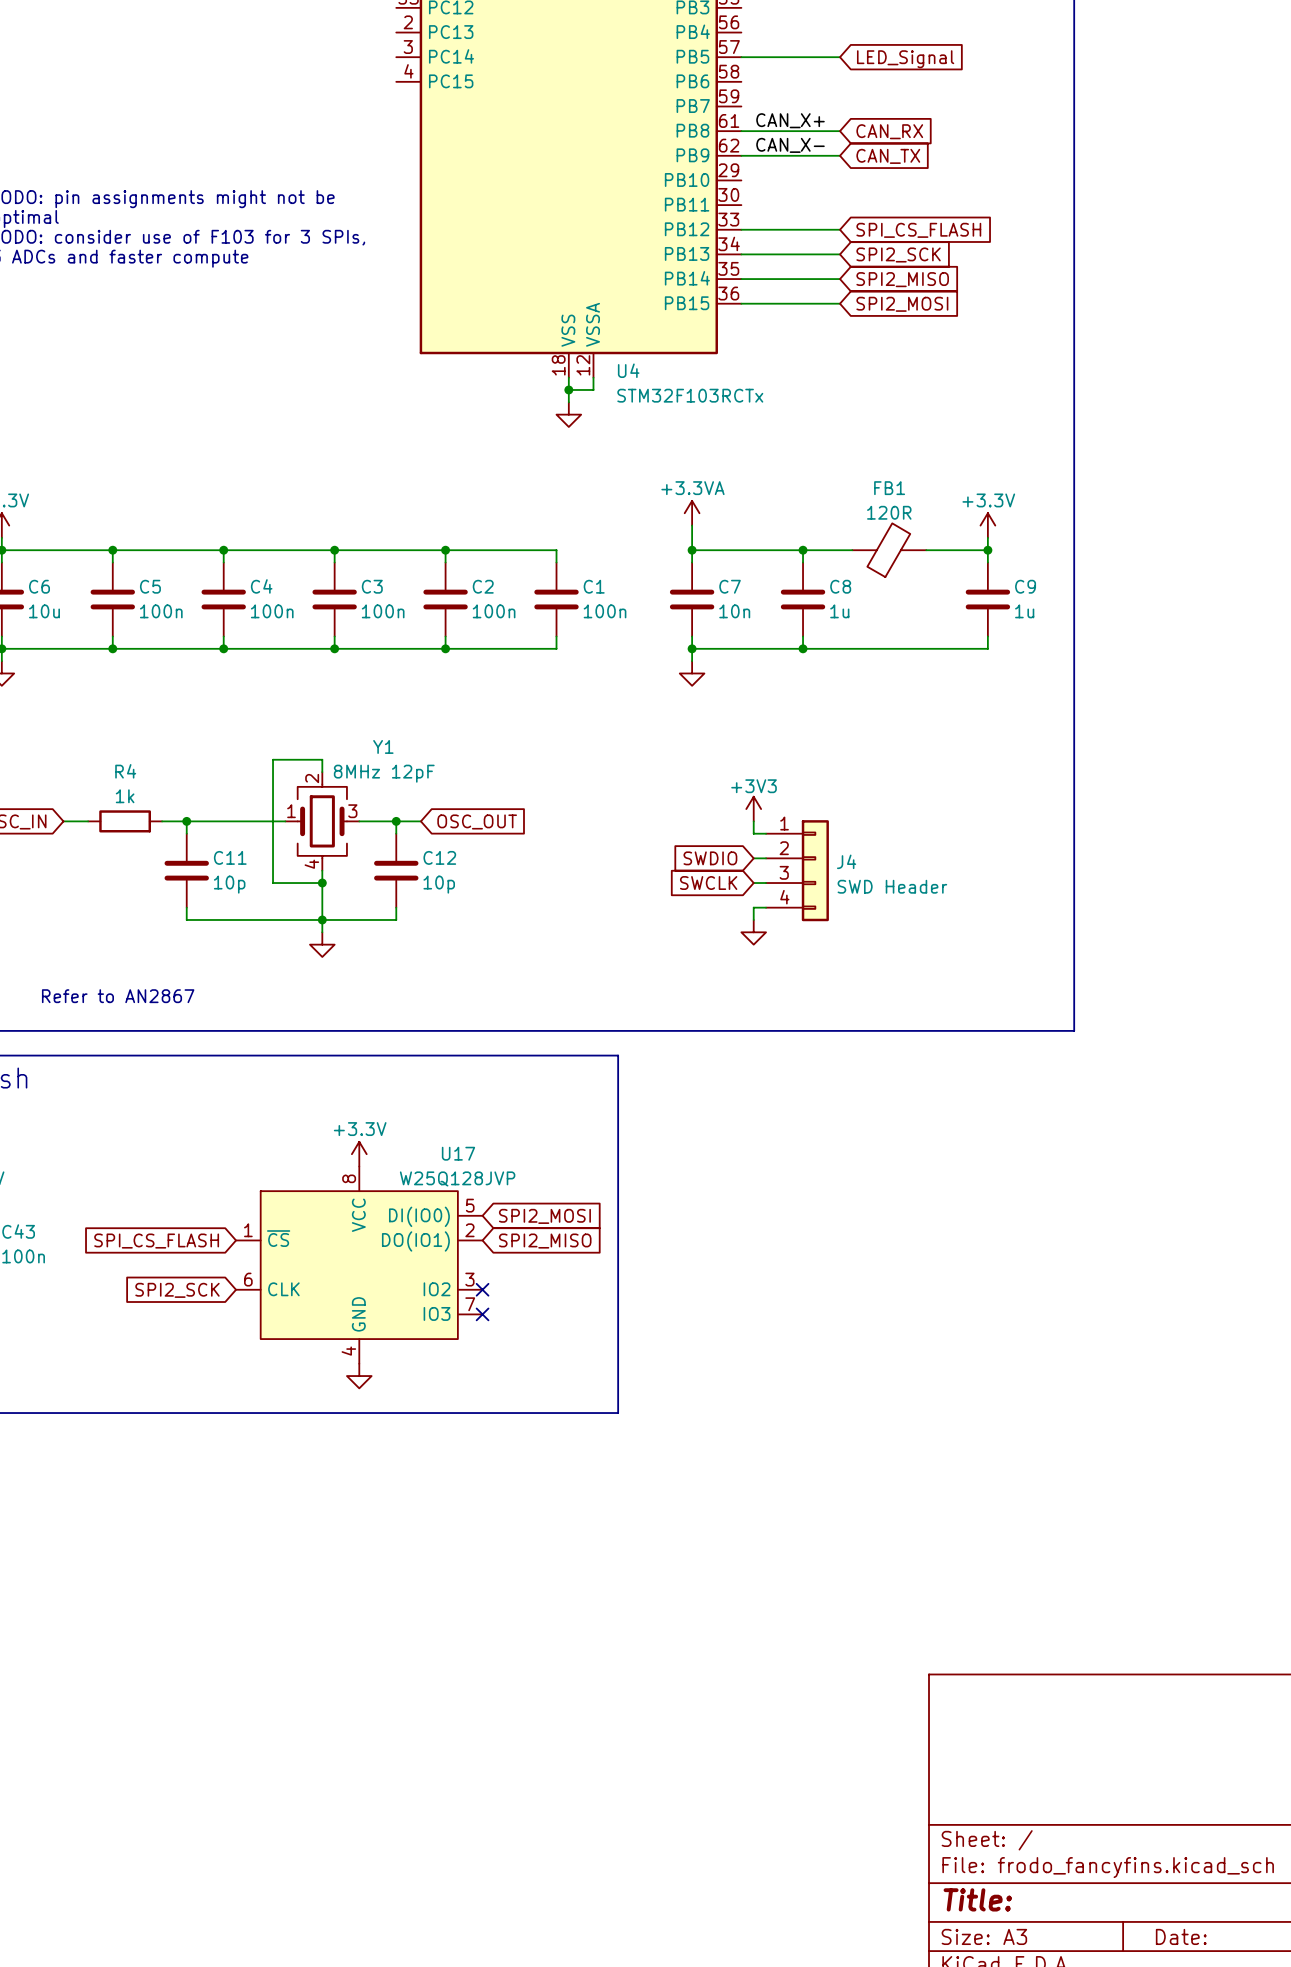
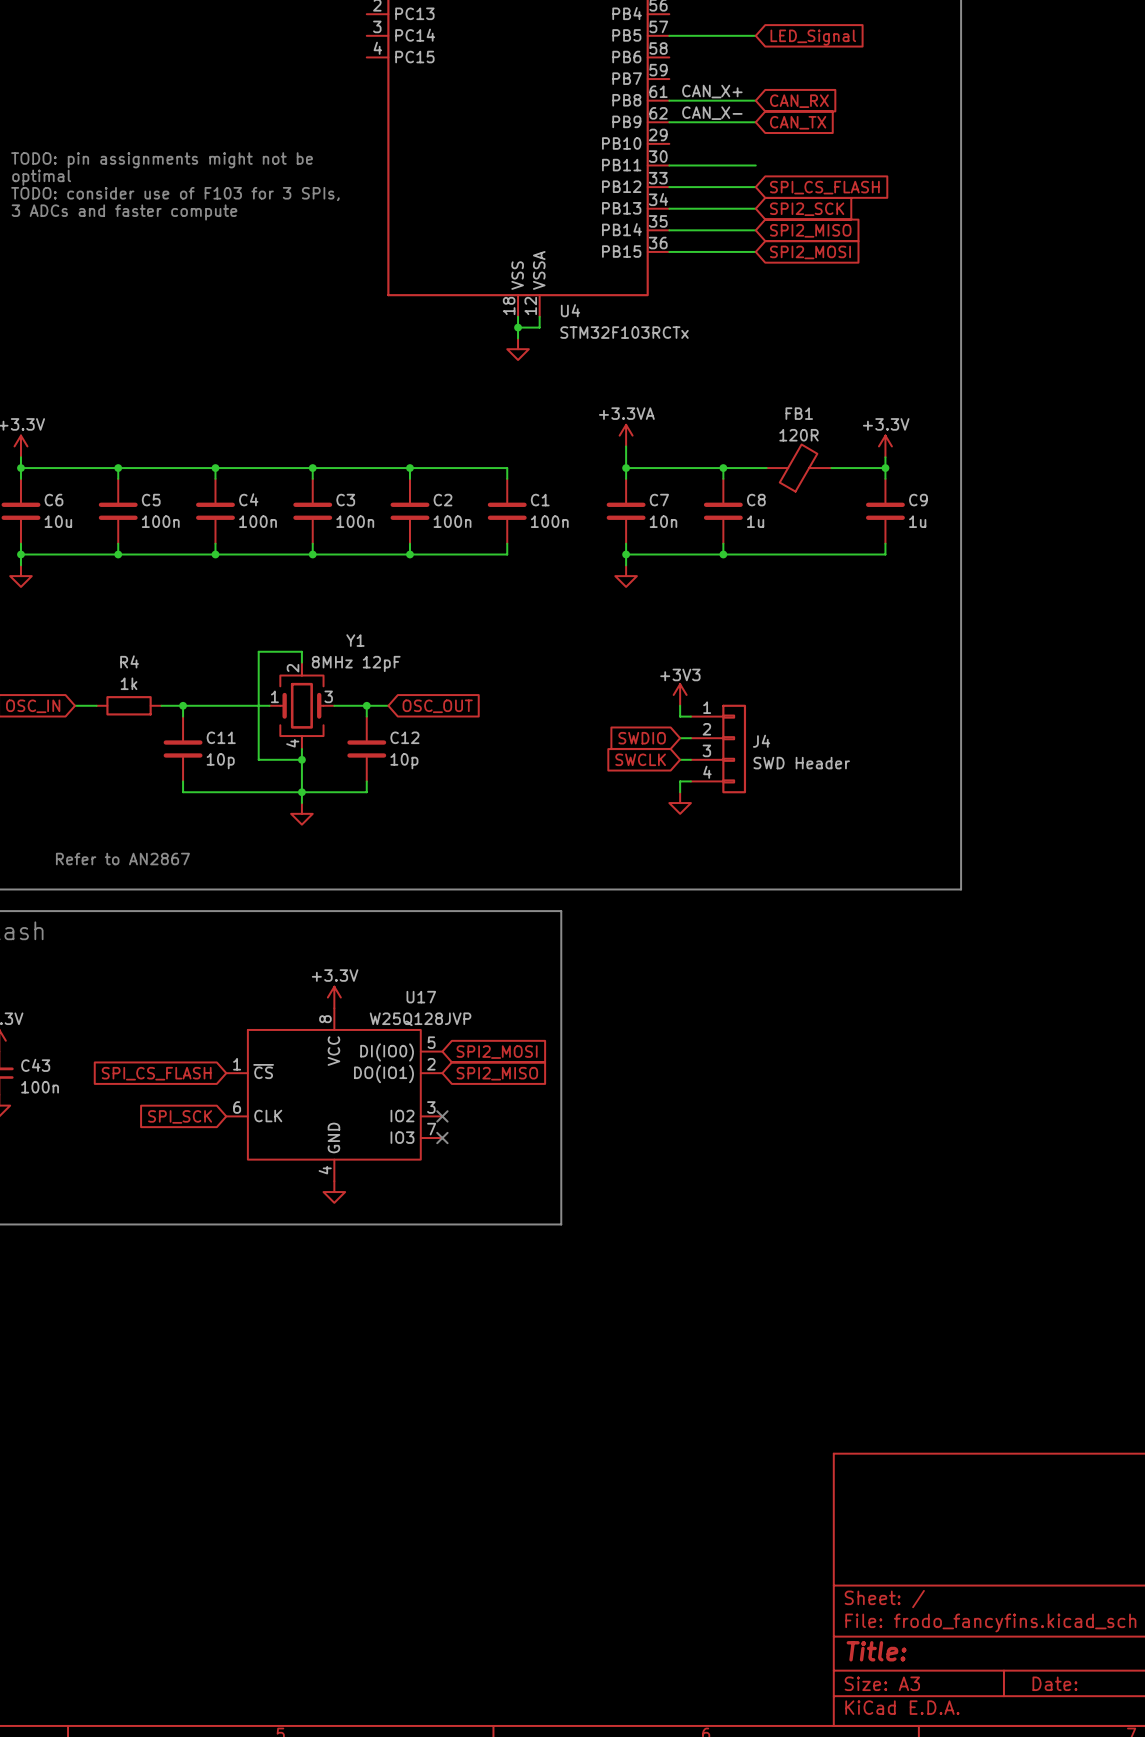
wire: none -> (669, 165) (755, 165)
global label: SPI2_SCK (177, 1290) -> SPI_SCK (180, 1116)

